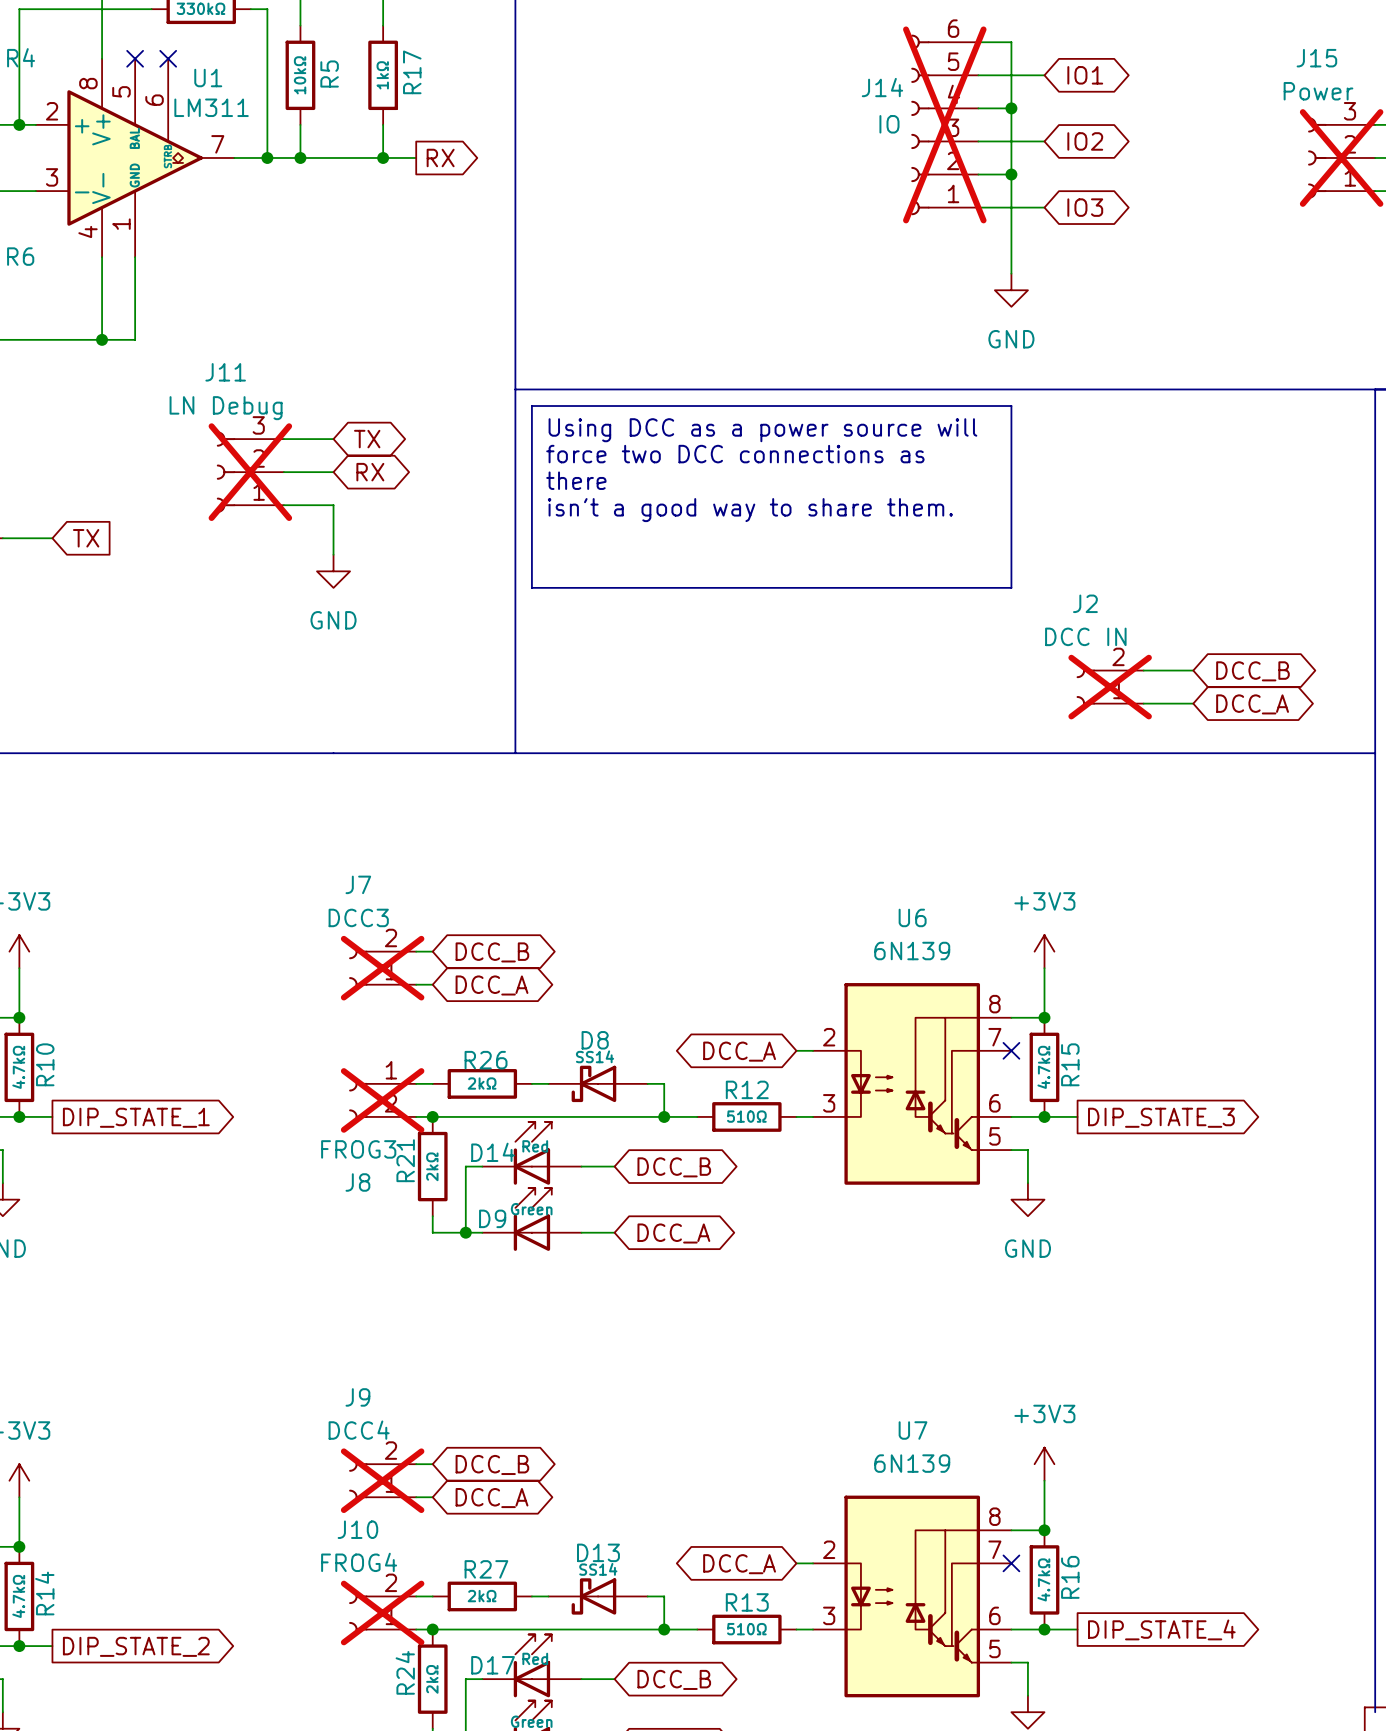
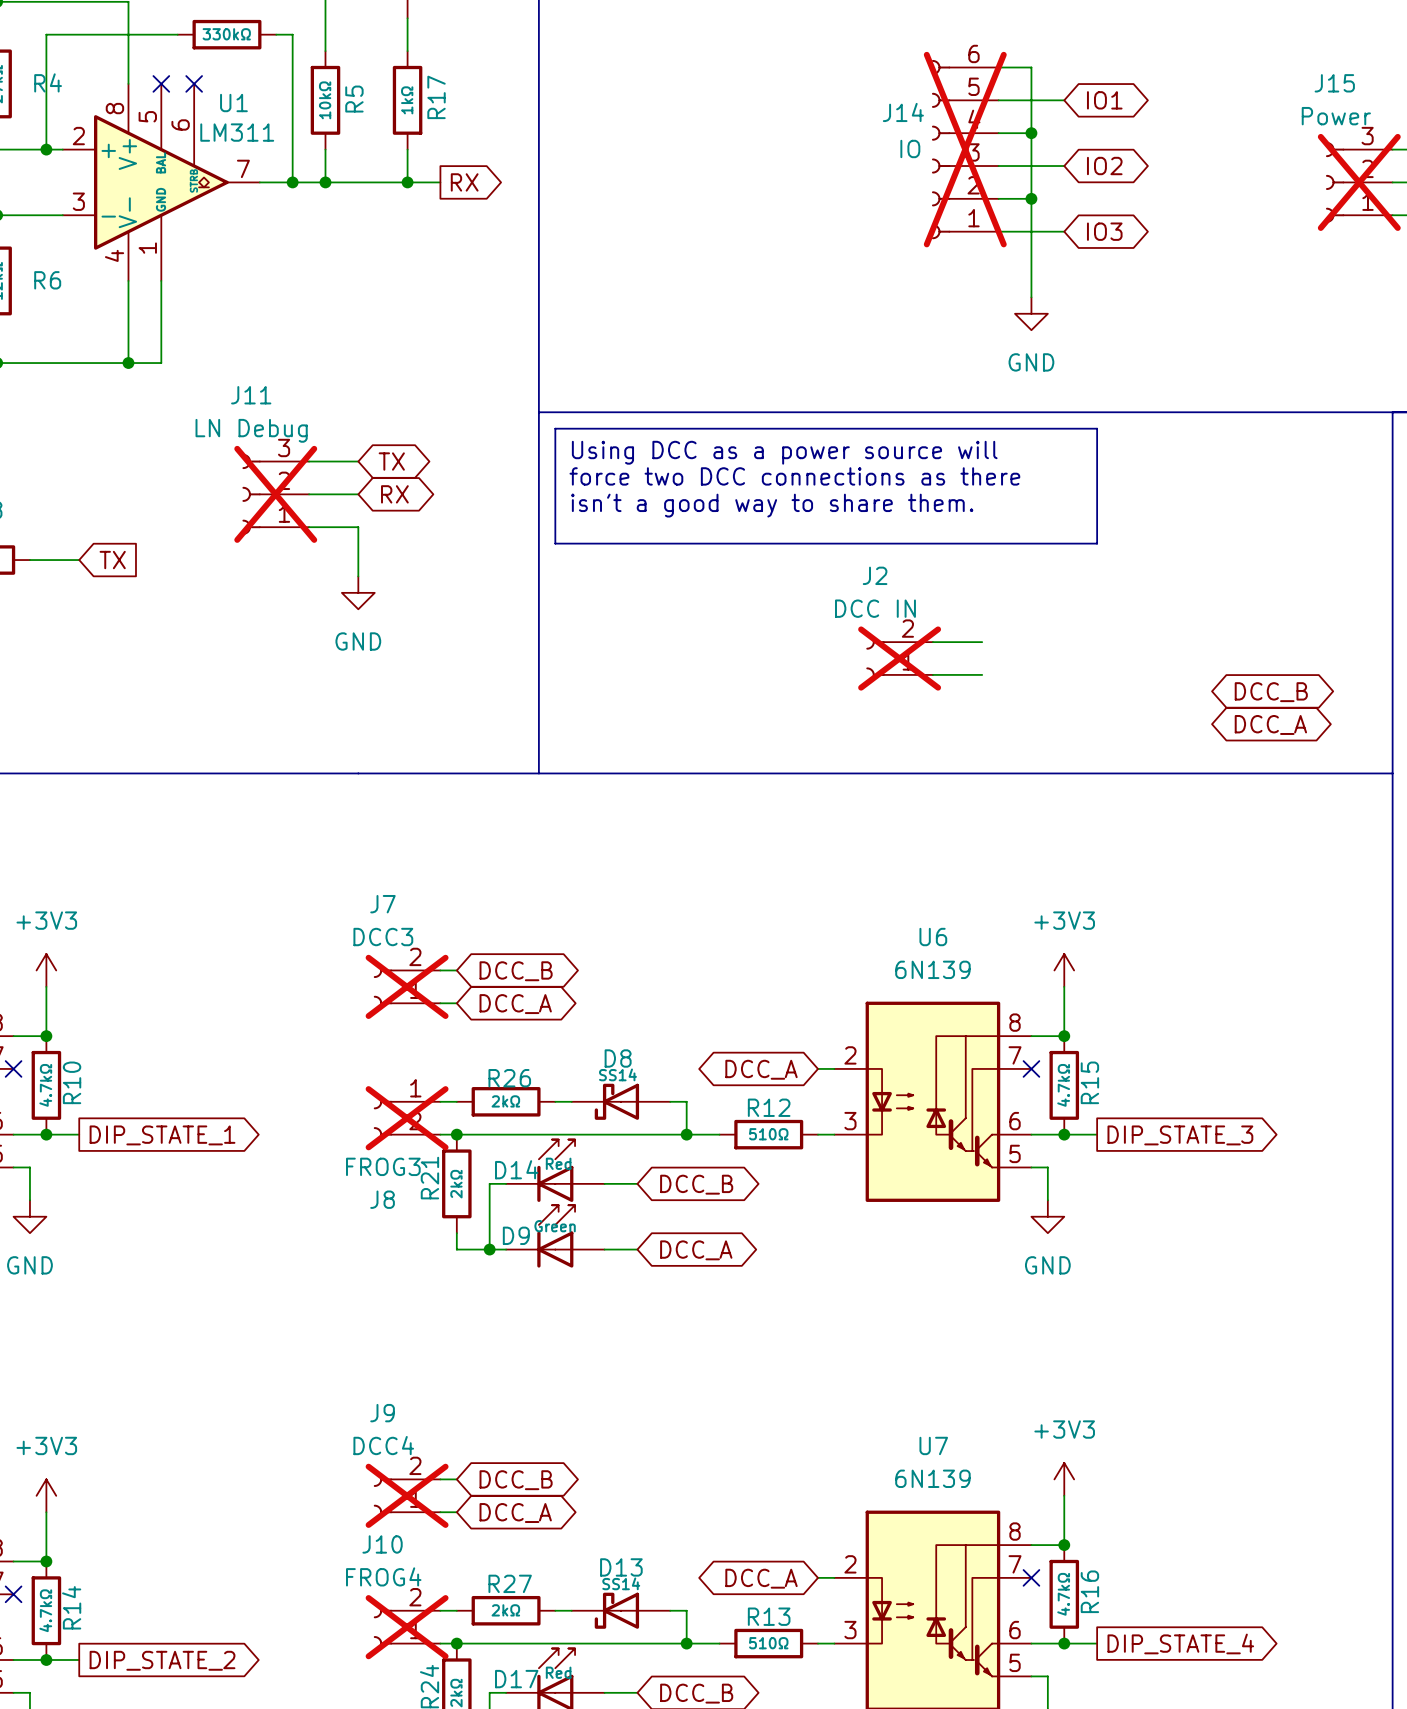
line: (1011, 406) (1011, 587) (531, 587) (531, 521) -> (1031, 428) (1097, 428) (1097, 543) (555, 543)
text: force two DCC connections as (735, 454) -> force two DCC connections as there (794, 476)
text: there (576, 480) -> isn't a good way to share them. (772, 505)
text: isn't a good way to share them. (750, 510) -> none
wire: (1143, 670) (1193, 670) -> (932, 642) (982, 642)
J2 position: (1110, 687) -> (899, 658)
wire: (1143, 703) (1193, 703) -> (932, 674) (982, 674)

